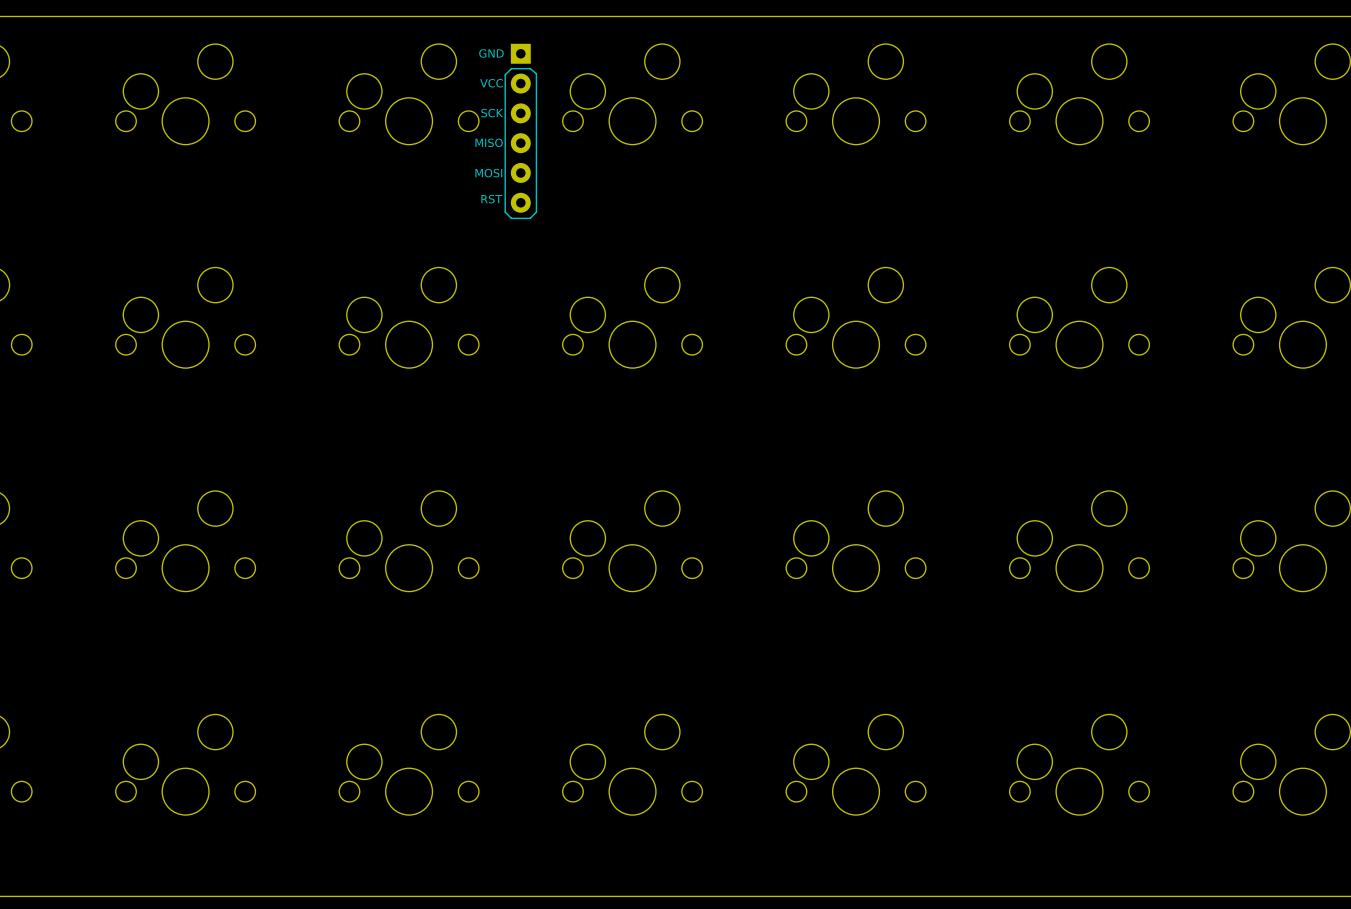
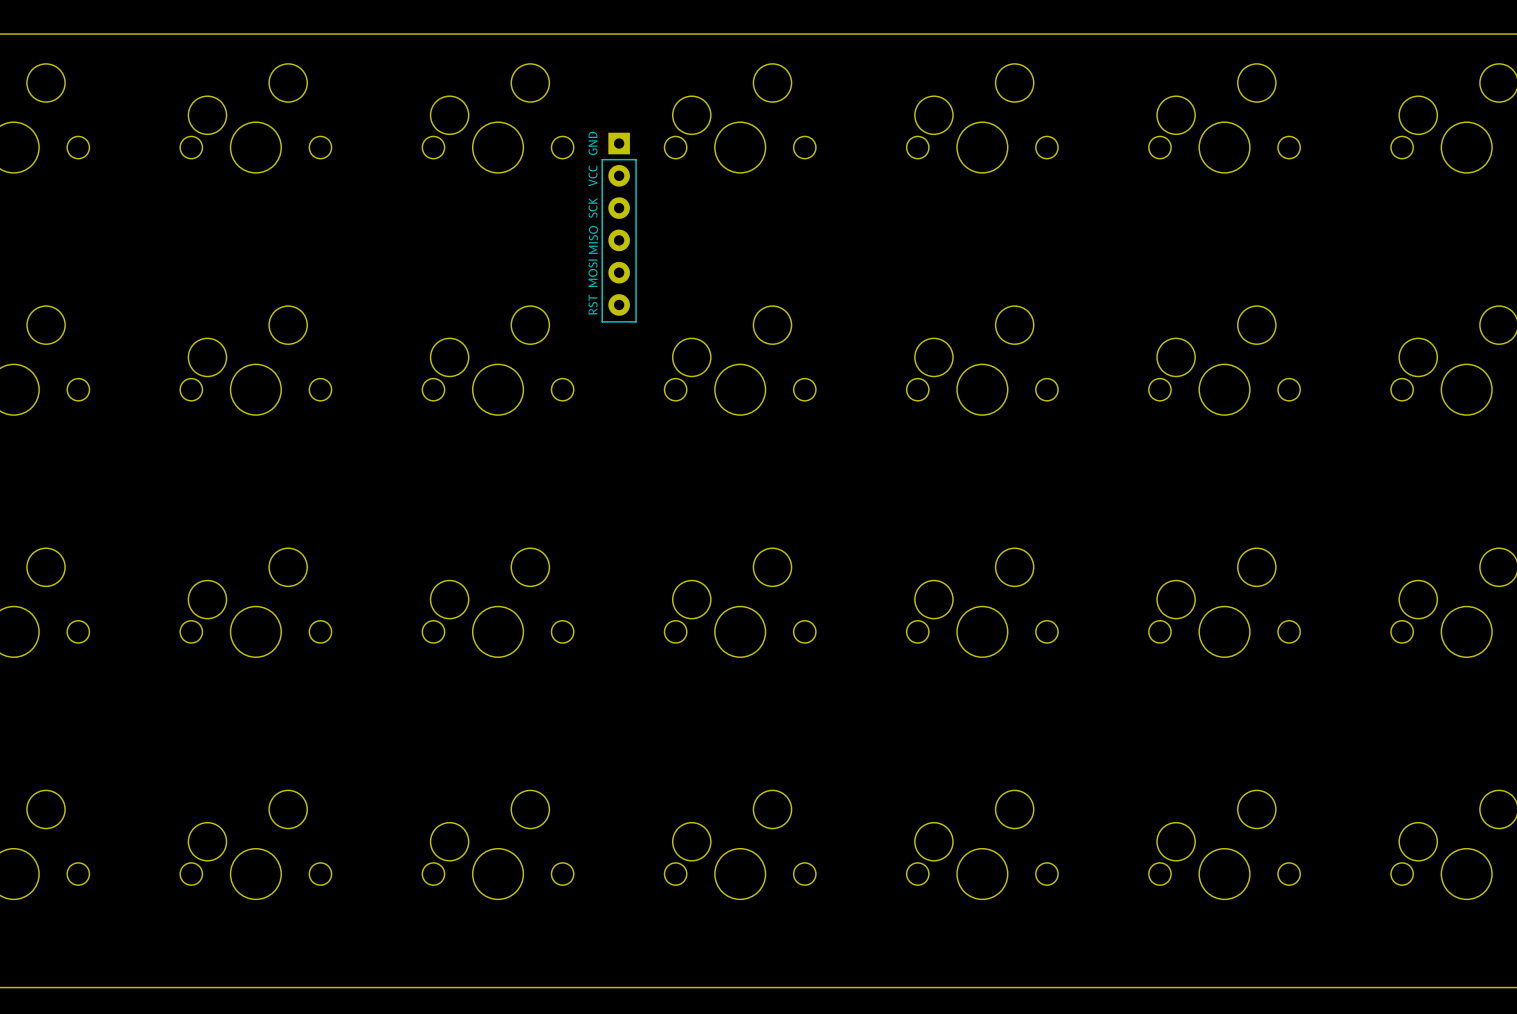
part: (520, 131) -> none
part: none -> (619, 227)

